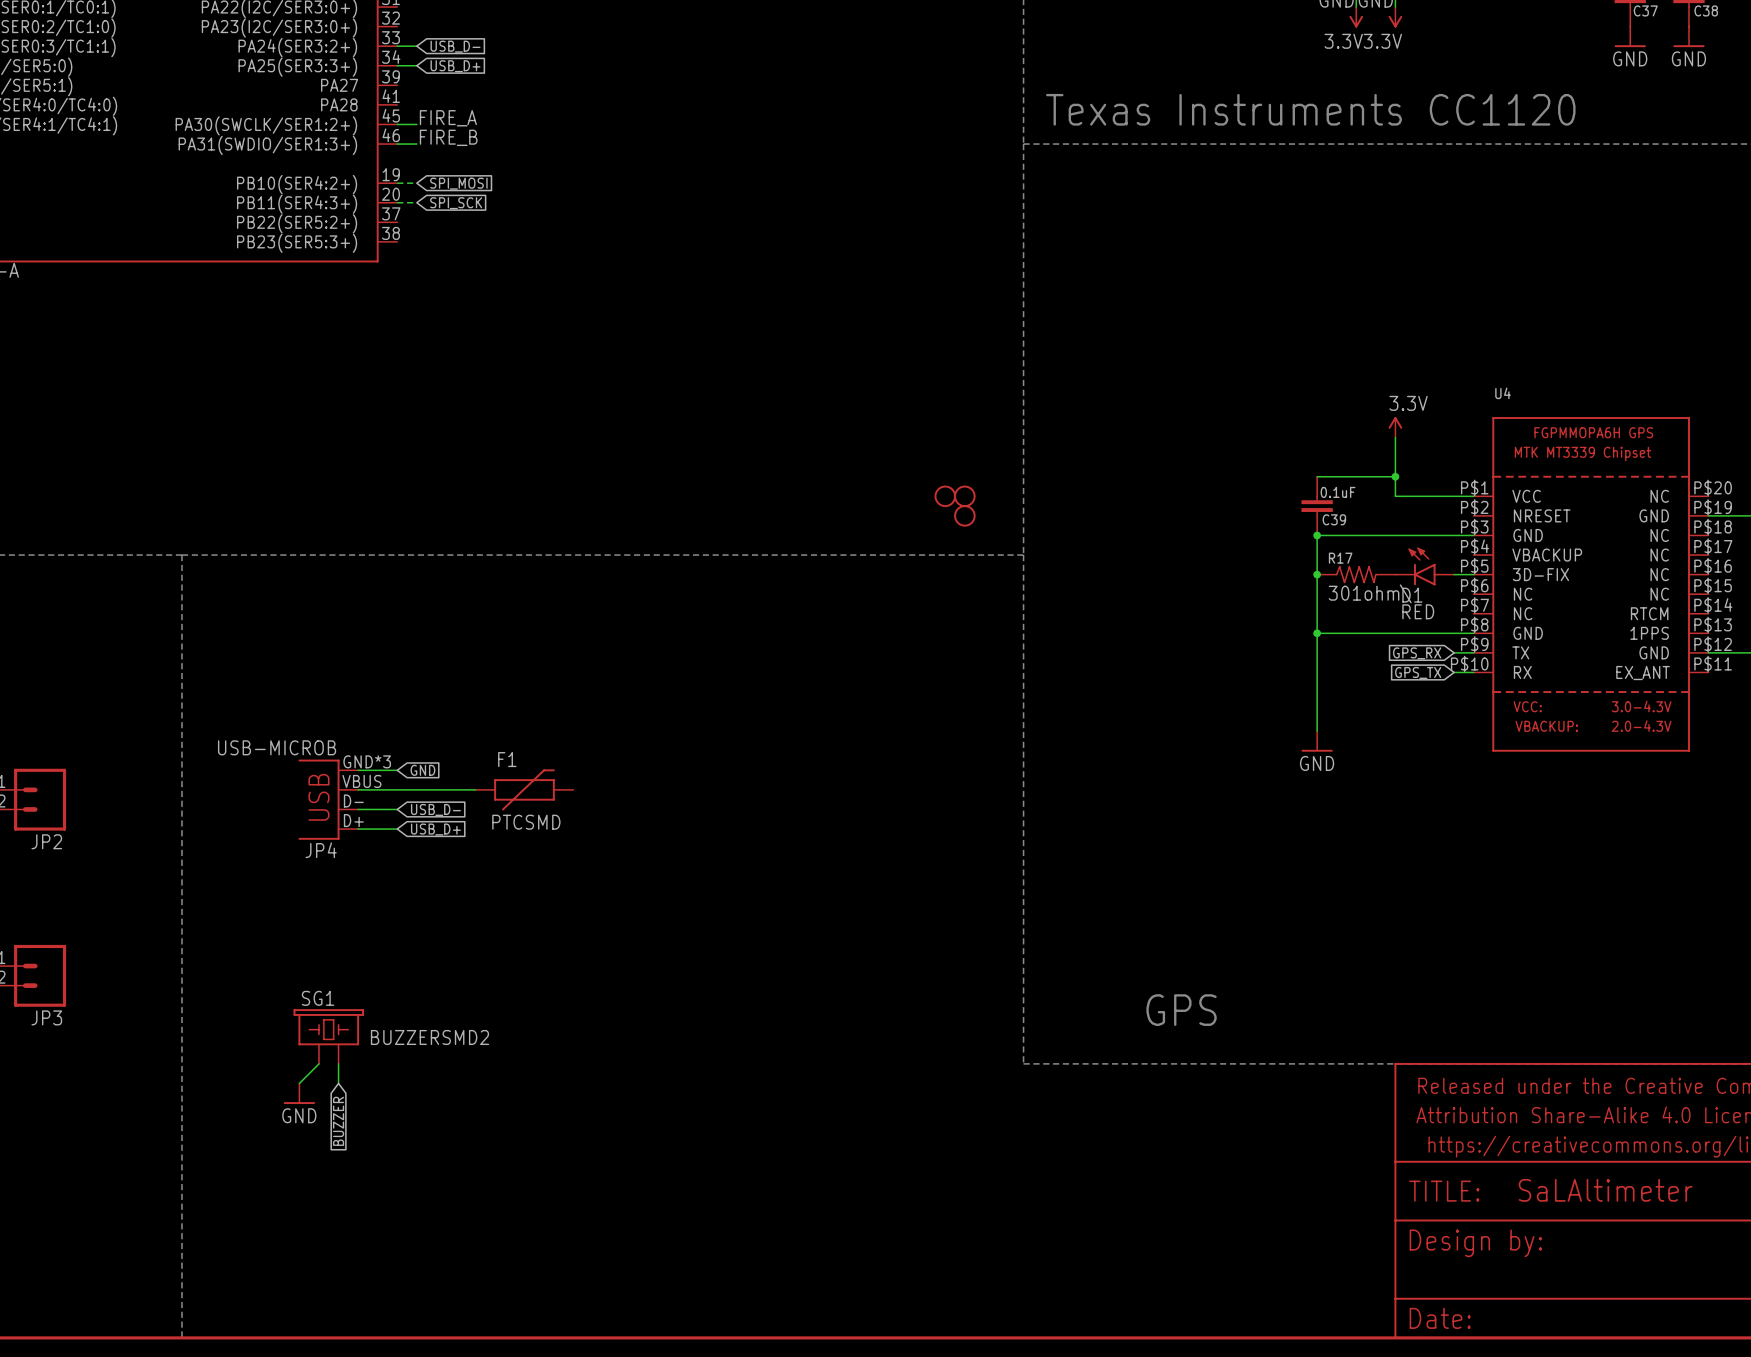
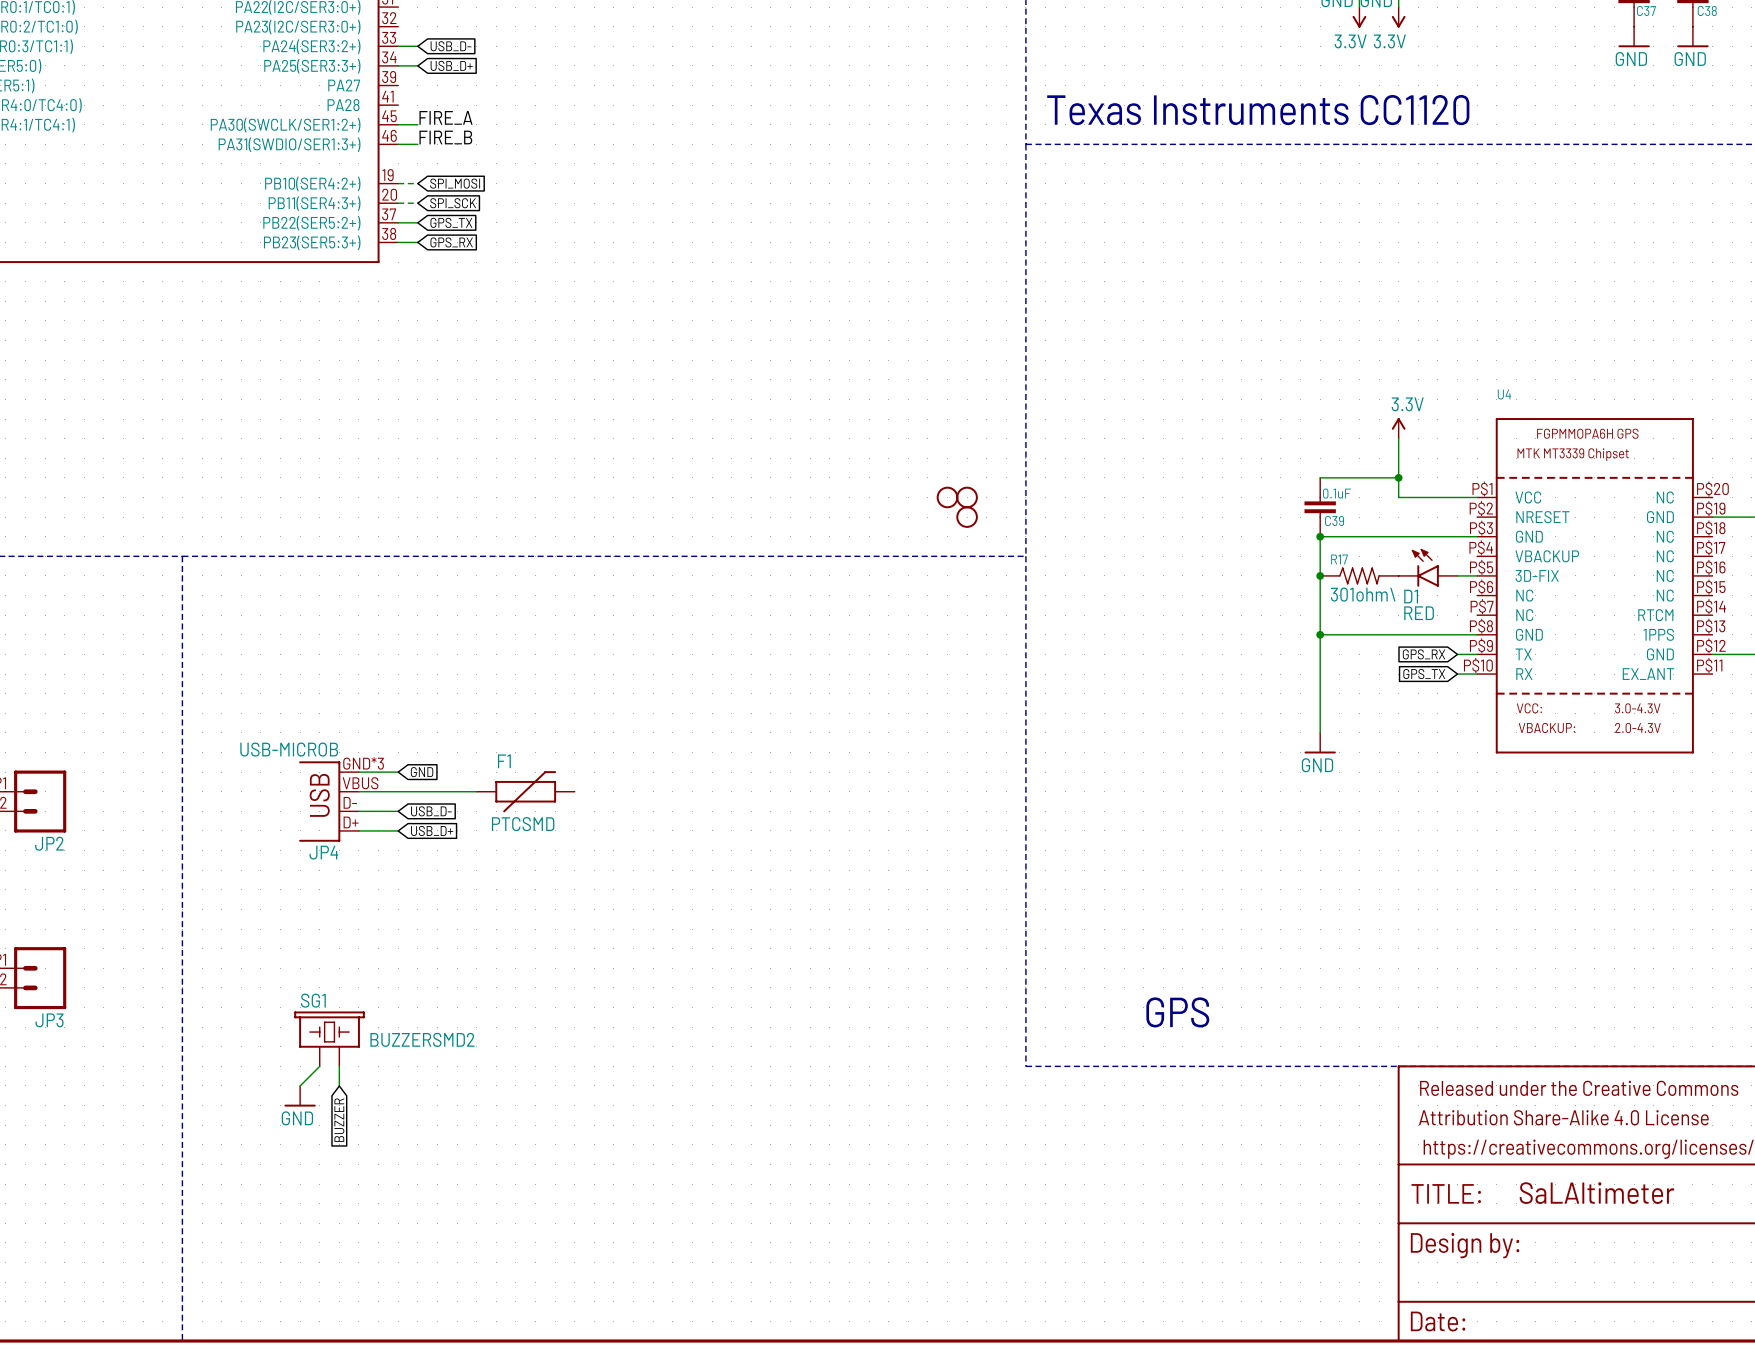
wire: none -> (398, 222) (417, 222)
global label: none -> GPS_TX (451, 222)
wire: none -> (398, 242) (417, 242)
global label: none -> GPS_RX (451, 242)

